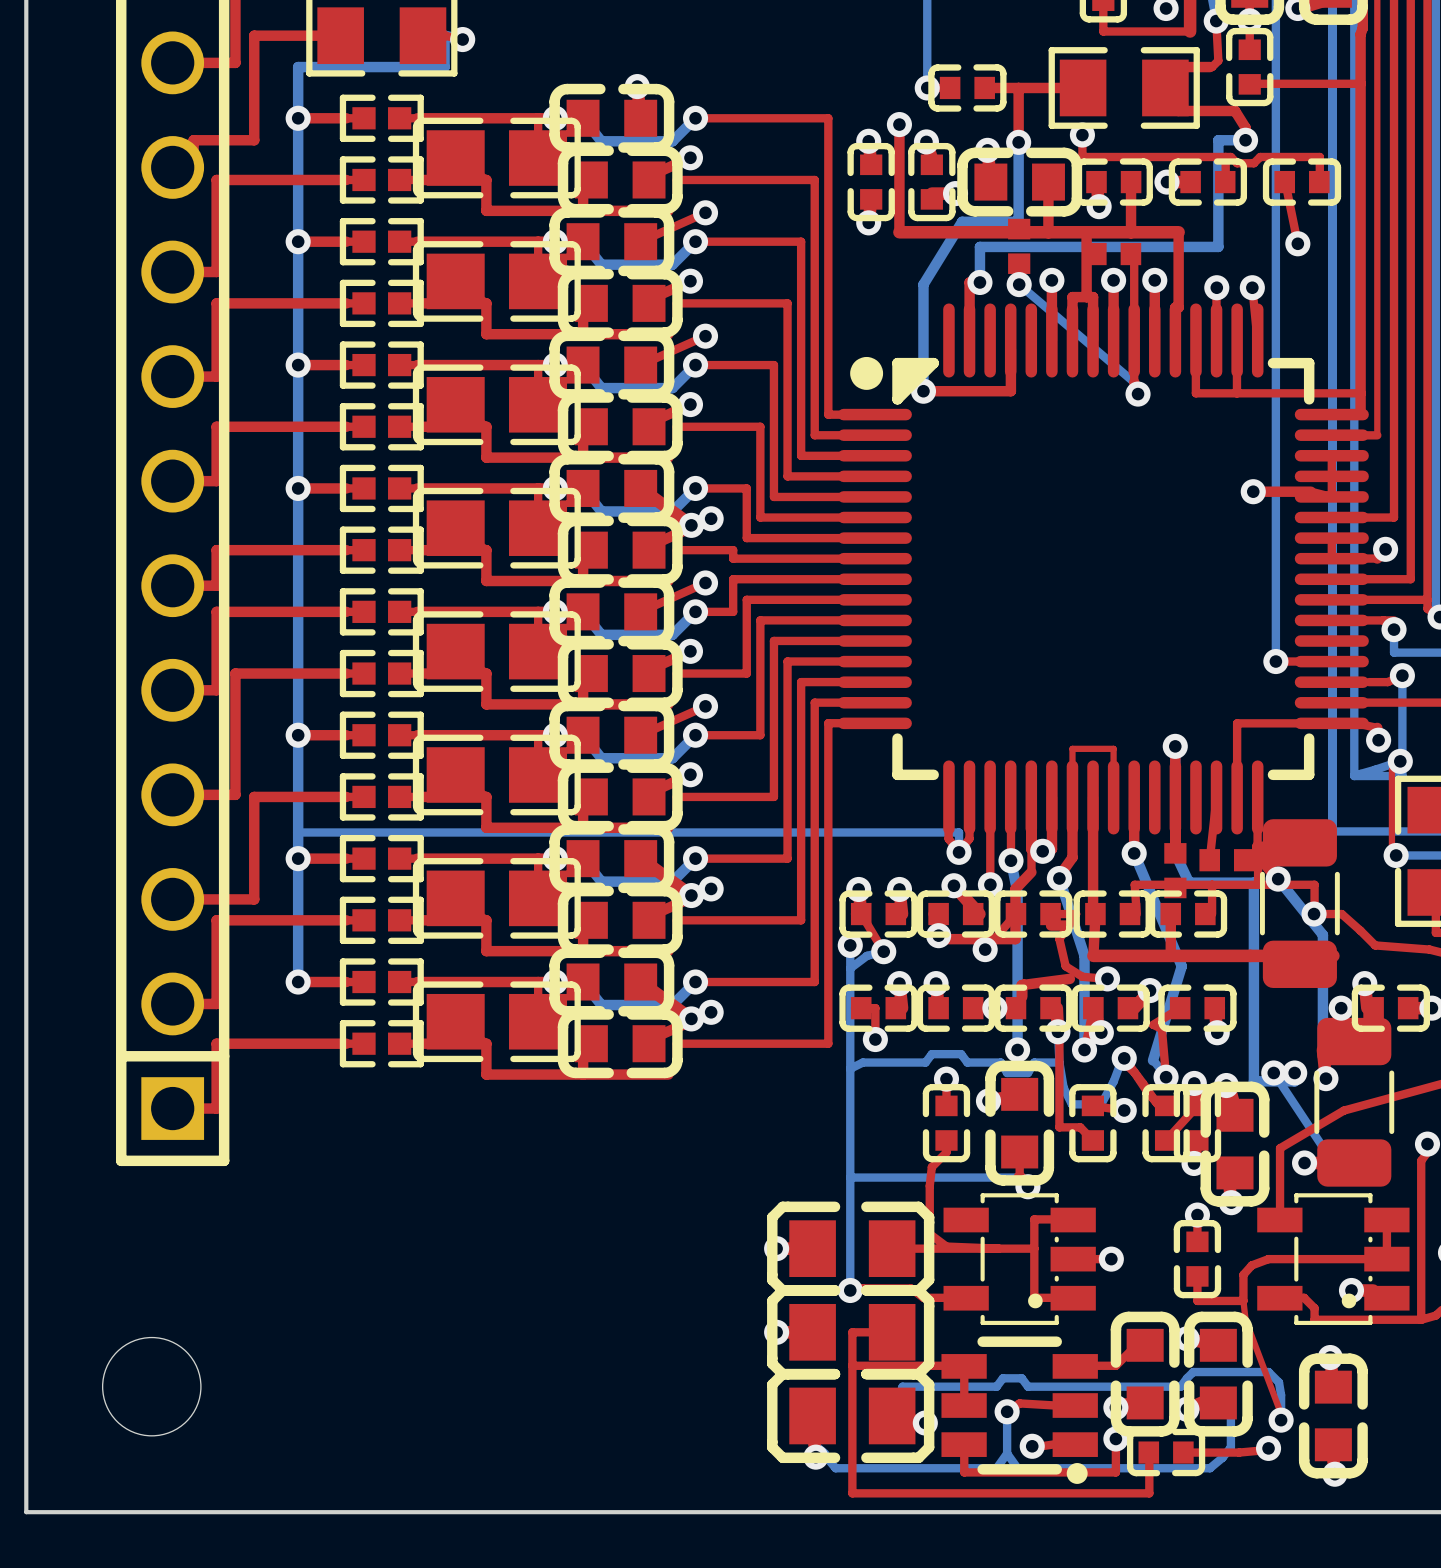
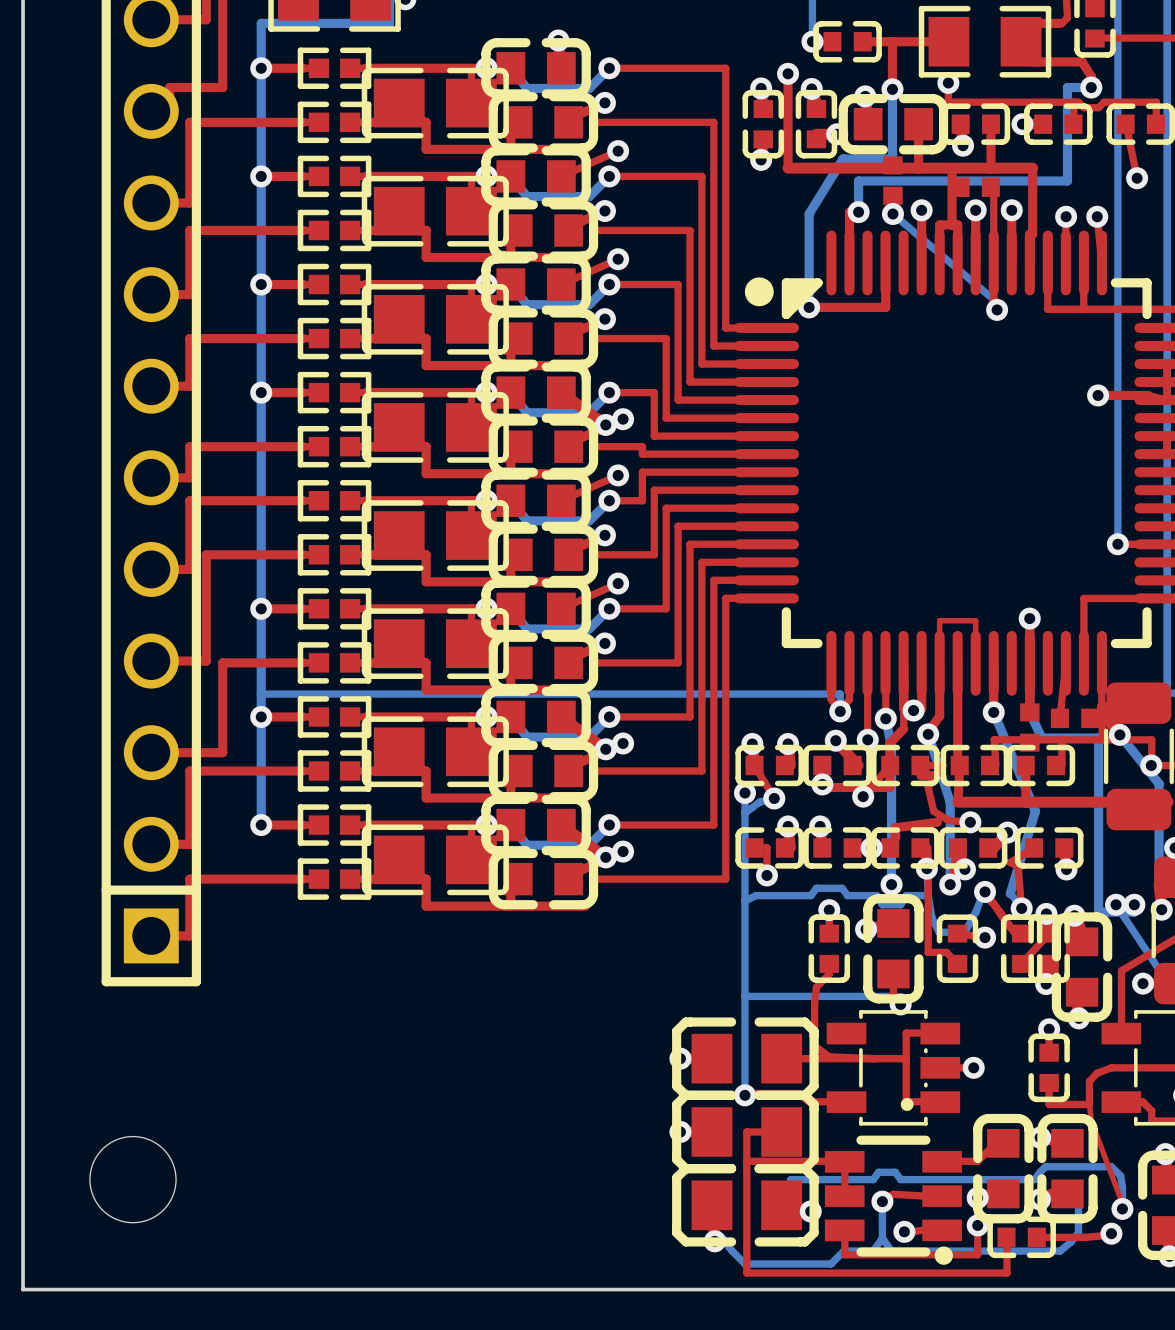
bottom track: (835, 1468) (963, 1468) -> (732, 1251) (745, 1264) (831, 1264) (843, 1251)

